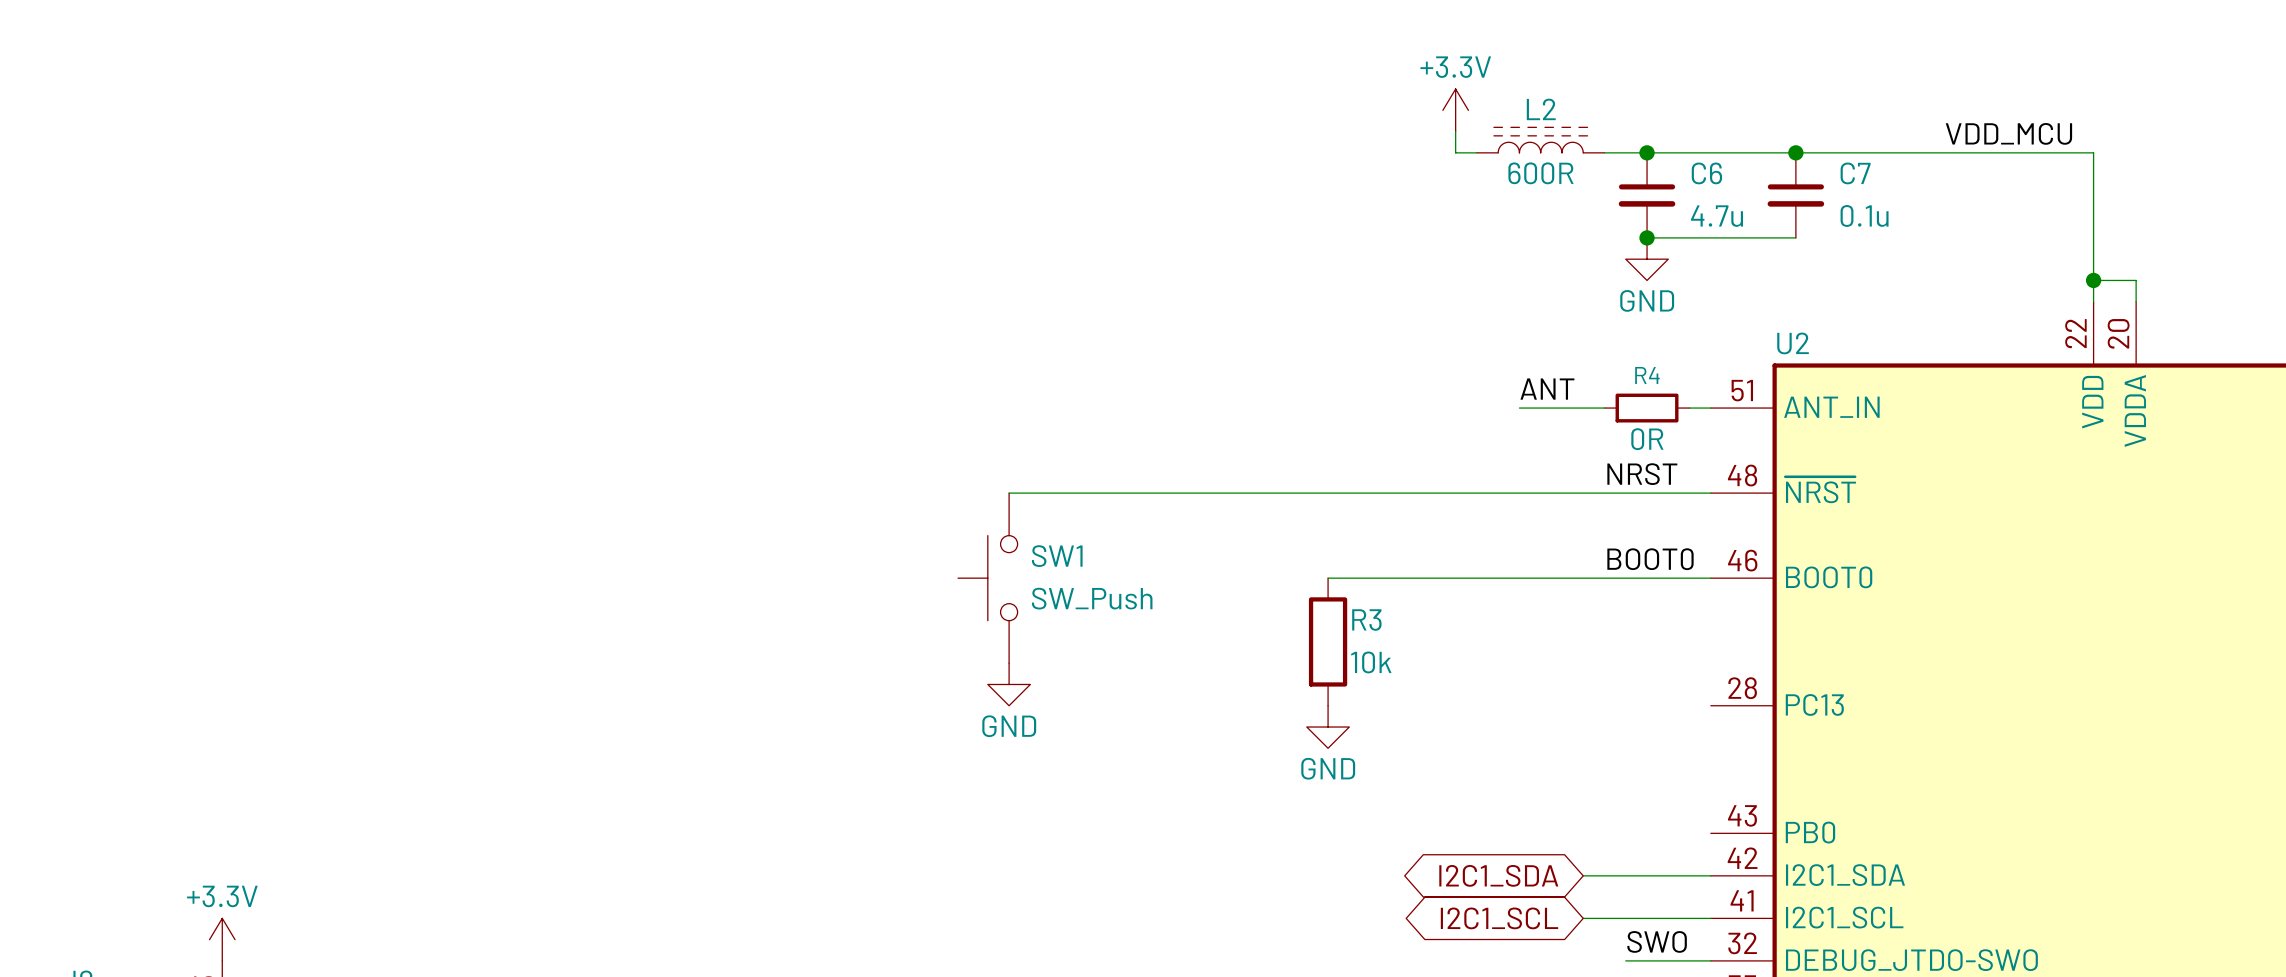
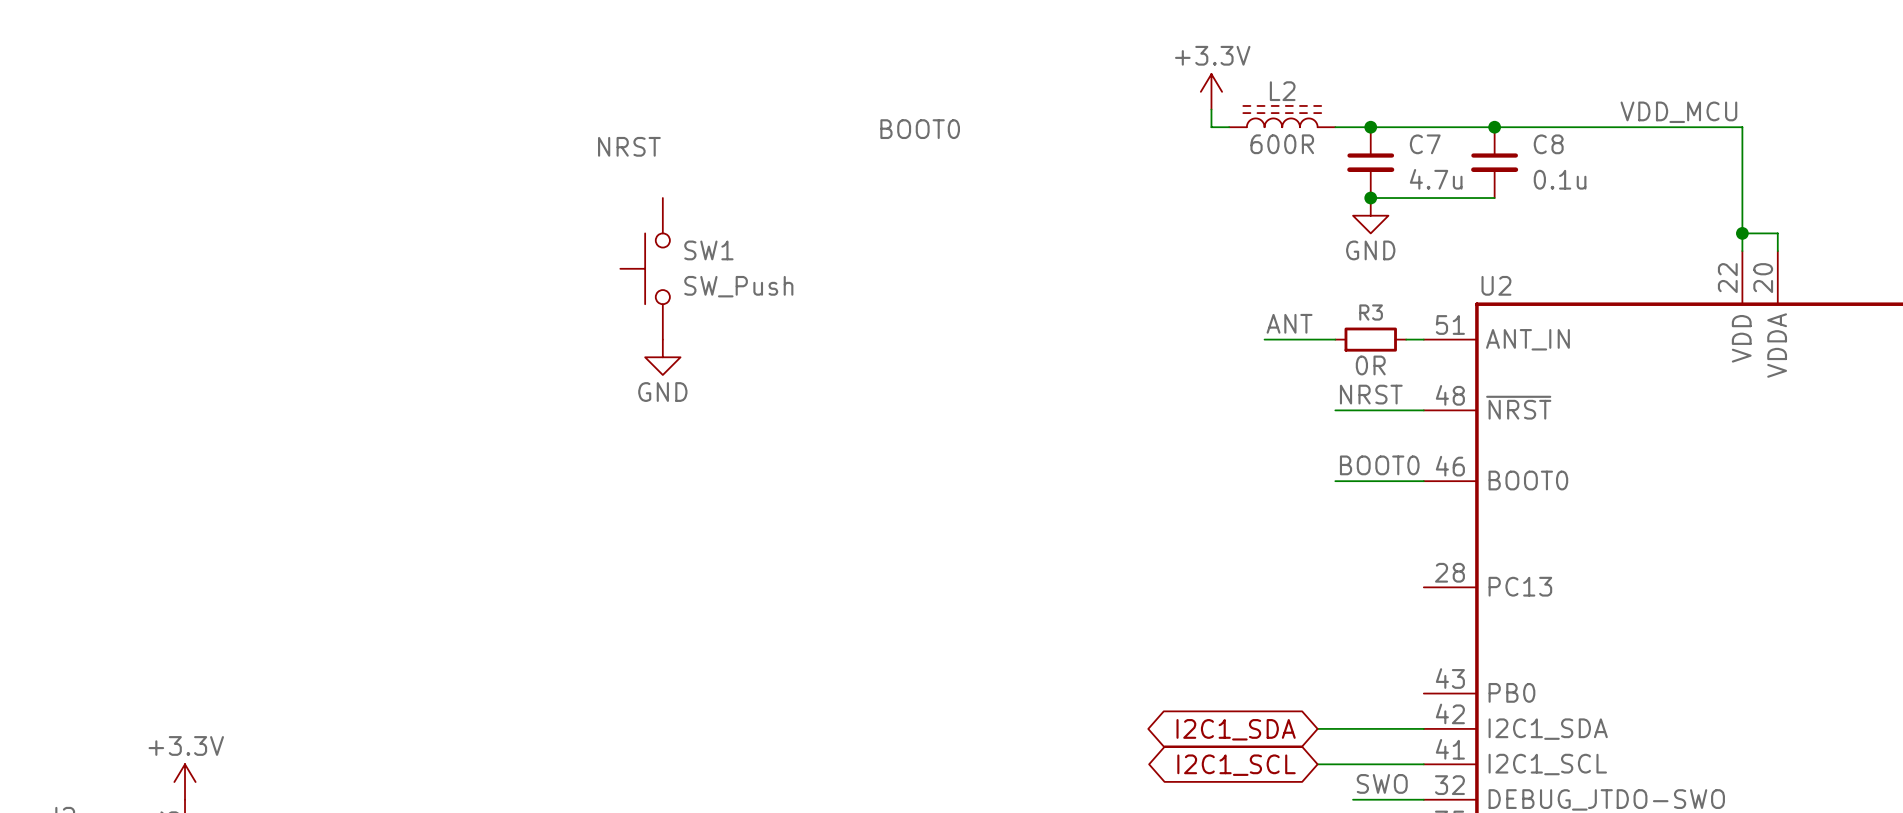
label: none -> BOOT0 (920, 129)
C6 name: C6 (1706, 173) -> C7 (1425, 144)
C7 name: C7 (1855, 173) -> C8 (1548, 144)
label: none -> NRST (629, 146)
R4 name: R4 (1647, 375) -> R3 (1371, 312)
power symbol: none -> GND (662, 357)
wire: (1009, 493) (1604, 493) -> none
SW1 position: (987, 578) -> (645, 268)
wire: (1328, 578) (1604, 578) -> none
R3: 10k (1328, 641) -> none
power symbol: GND (1009, 684) -> none
power symbol: GND (1328, 727) -> none

